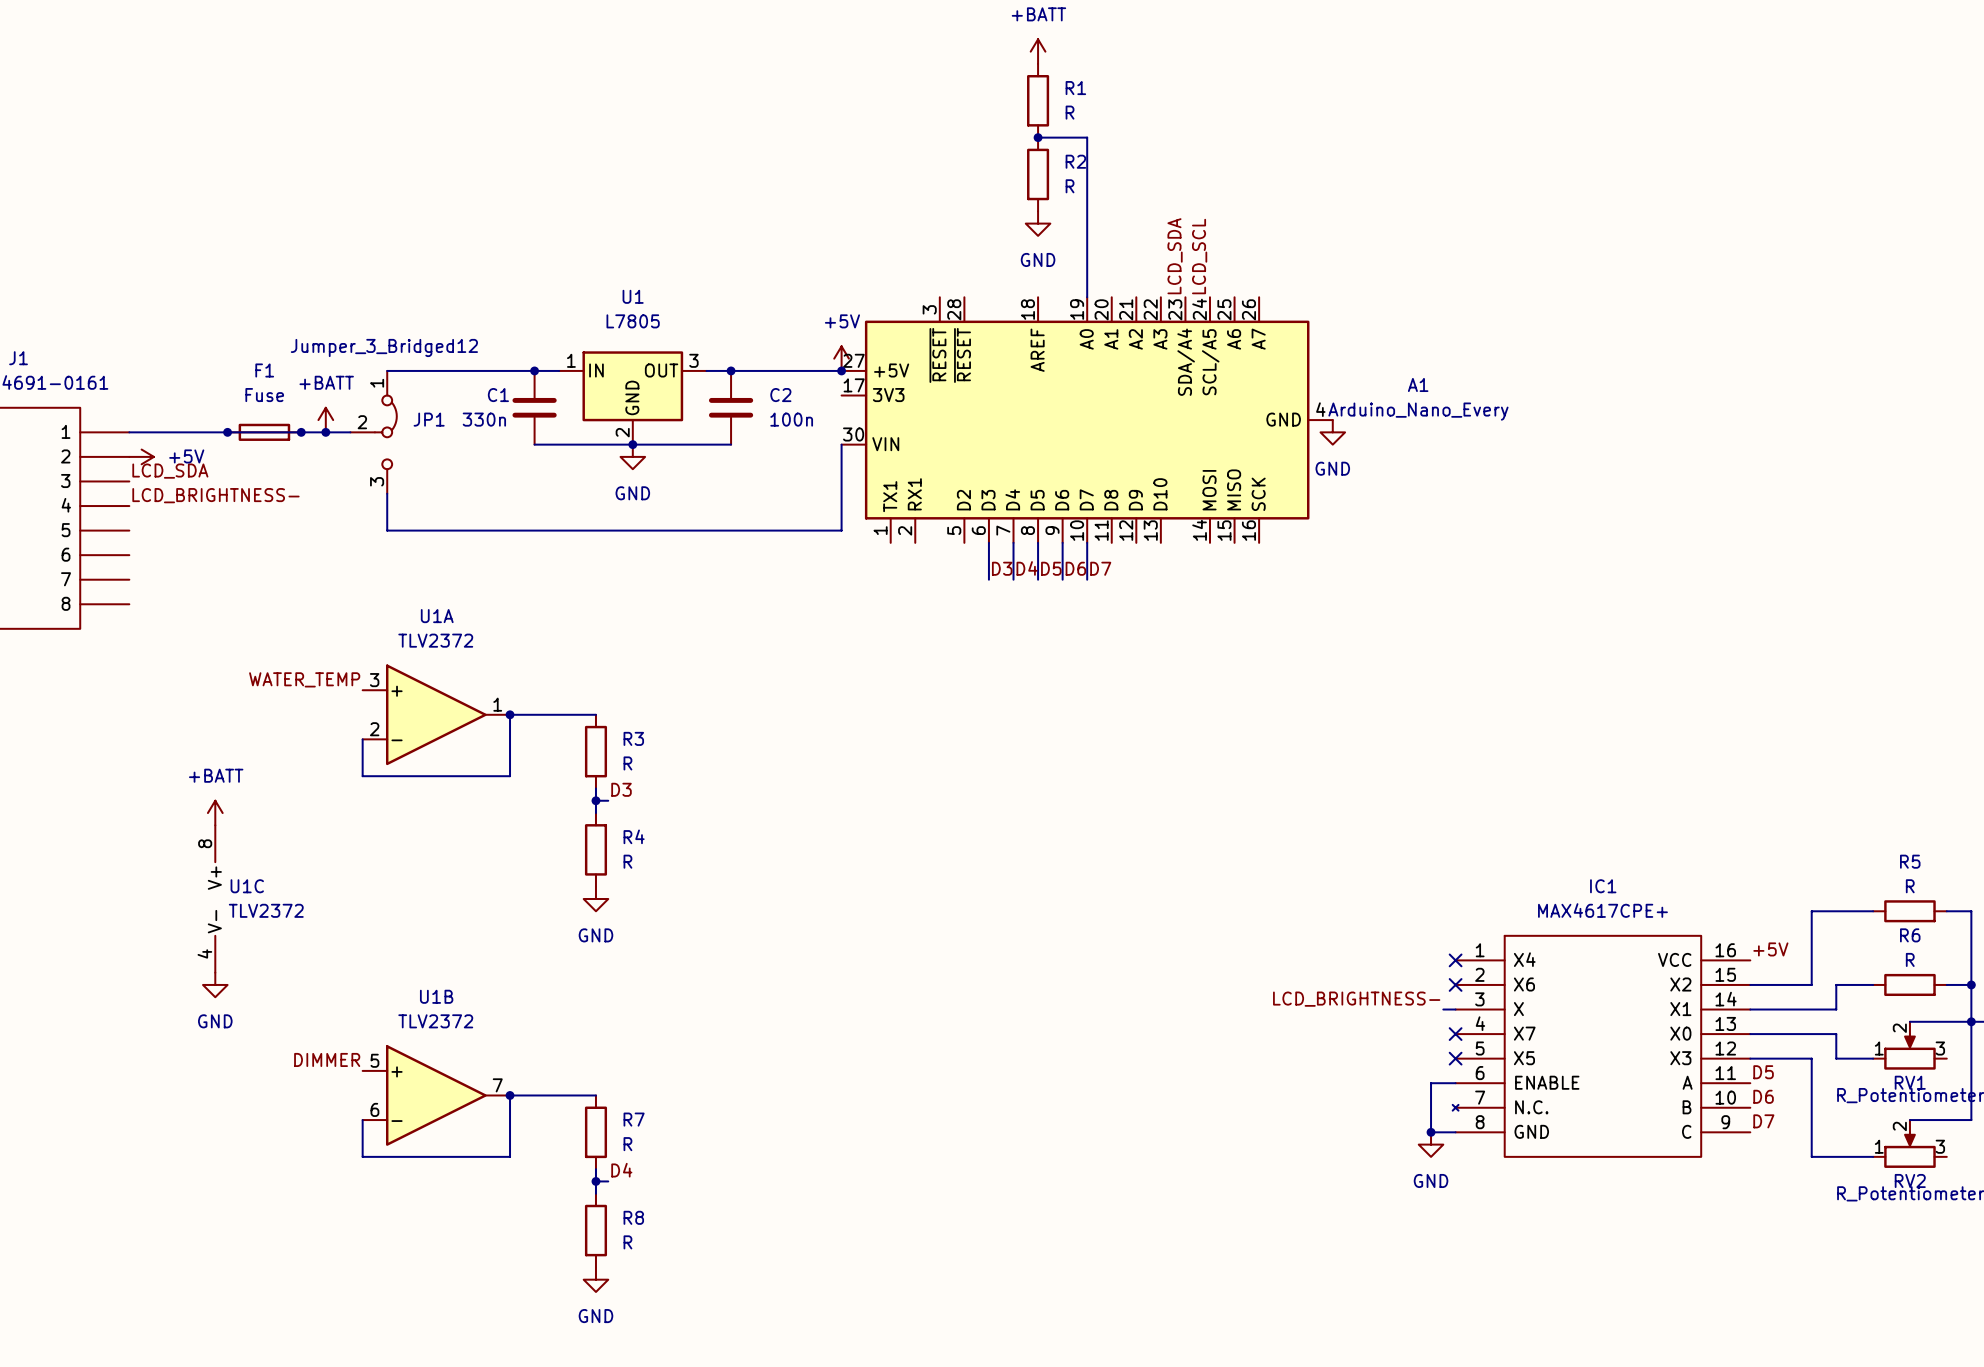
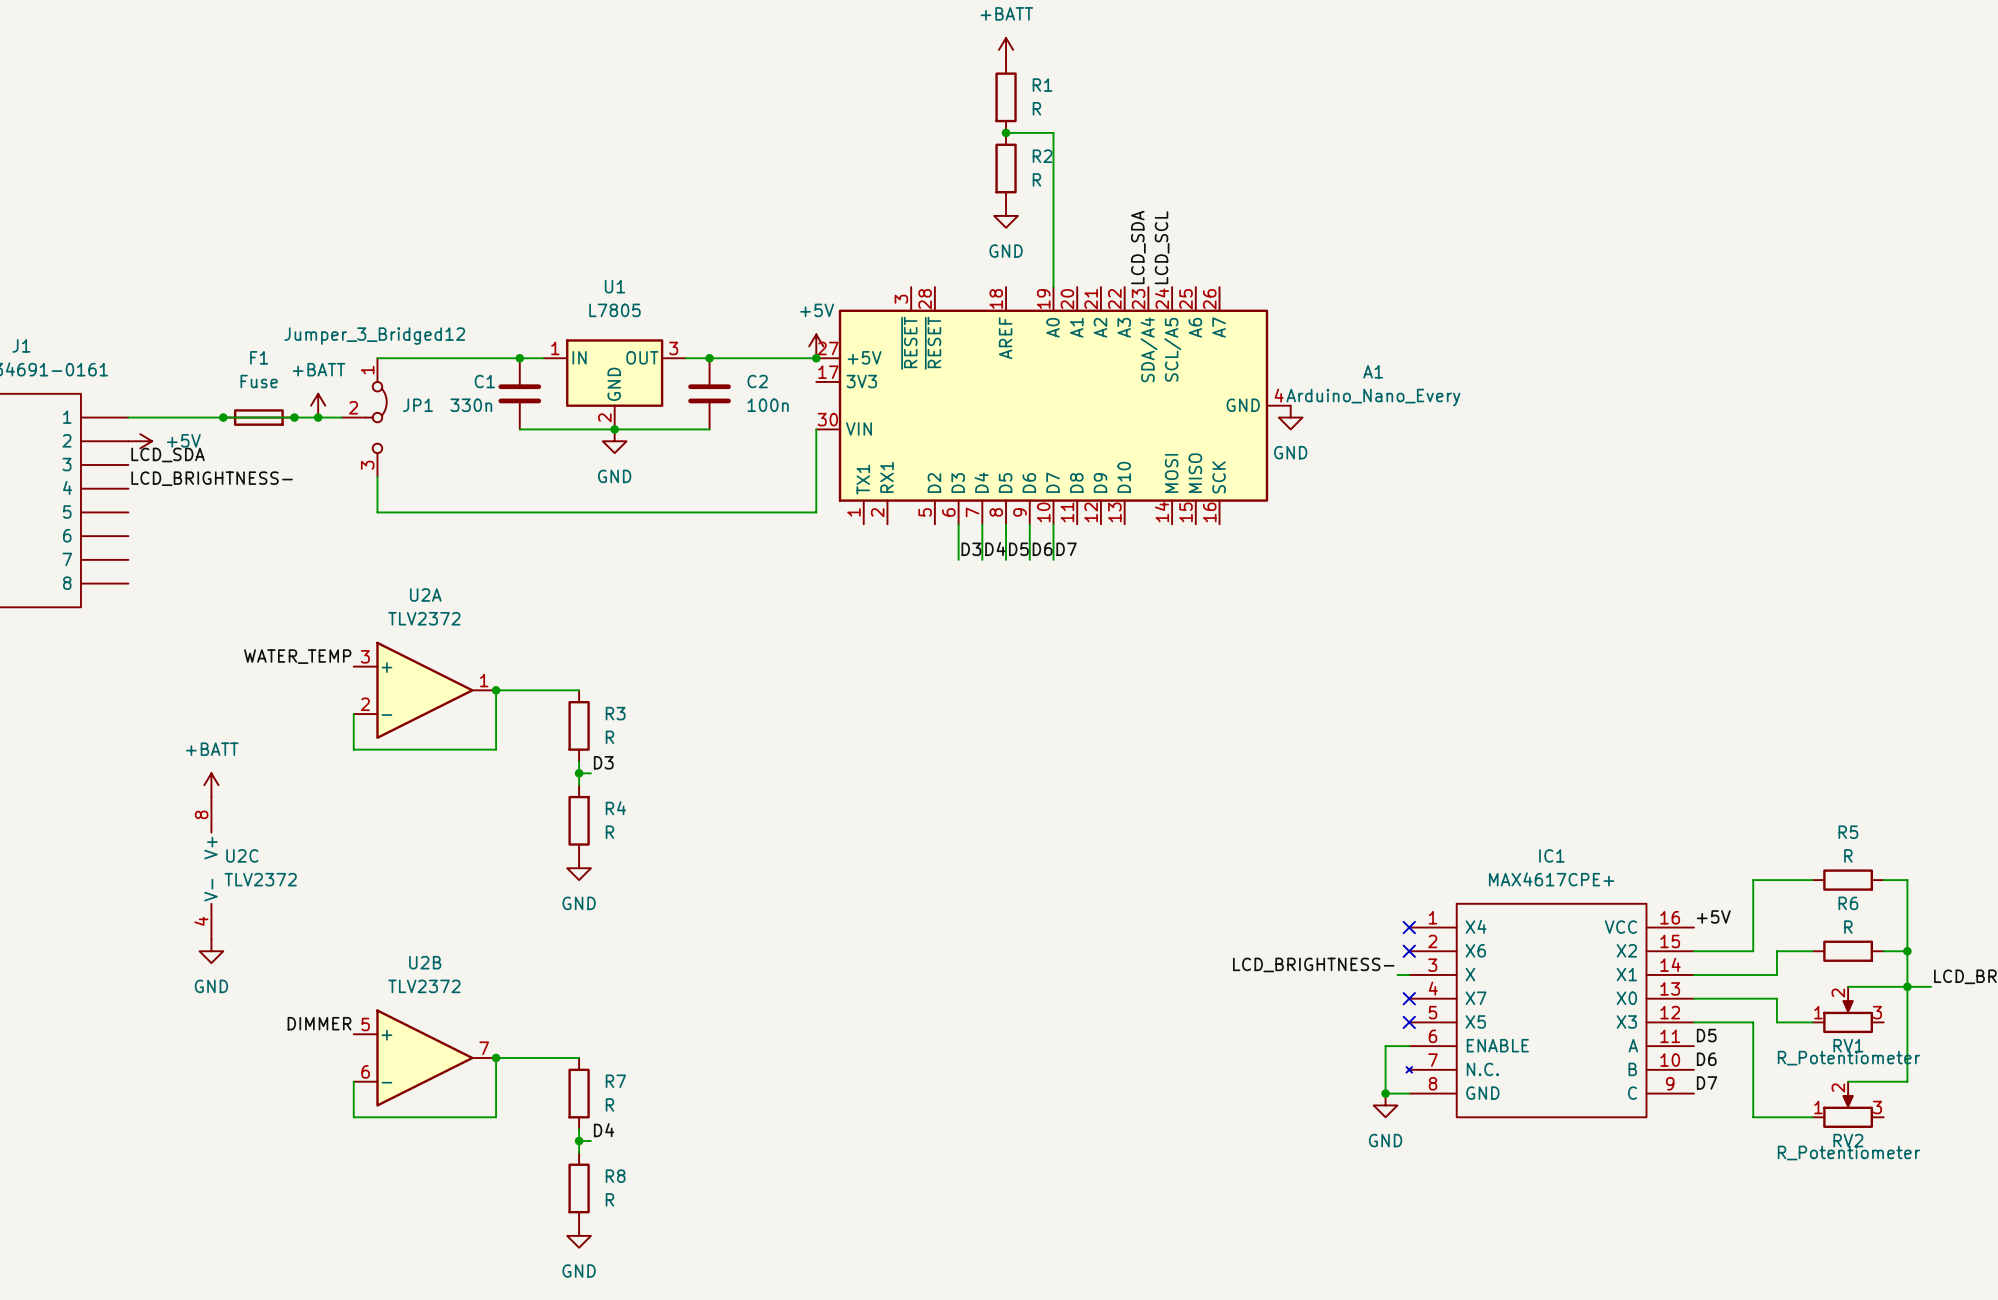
U1A name: U1A (437, 616) -> U2A (425, 595)
U1C name: U1C (247, 886) -> U2C (242, 855)
U1B name: U1B (436, 996) -> U2B (425, 962)

